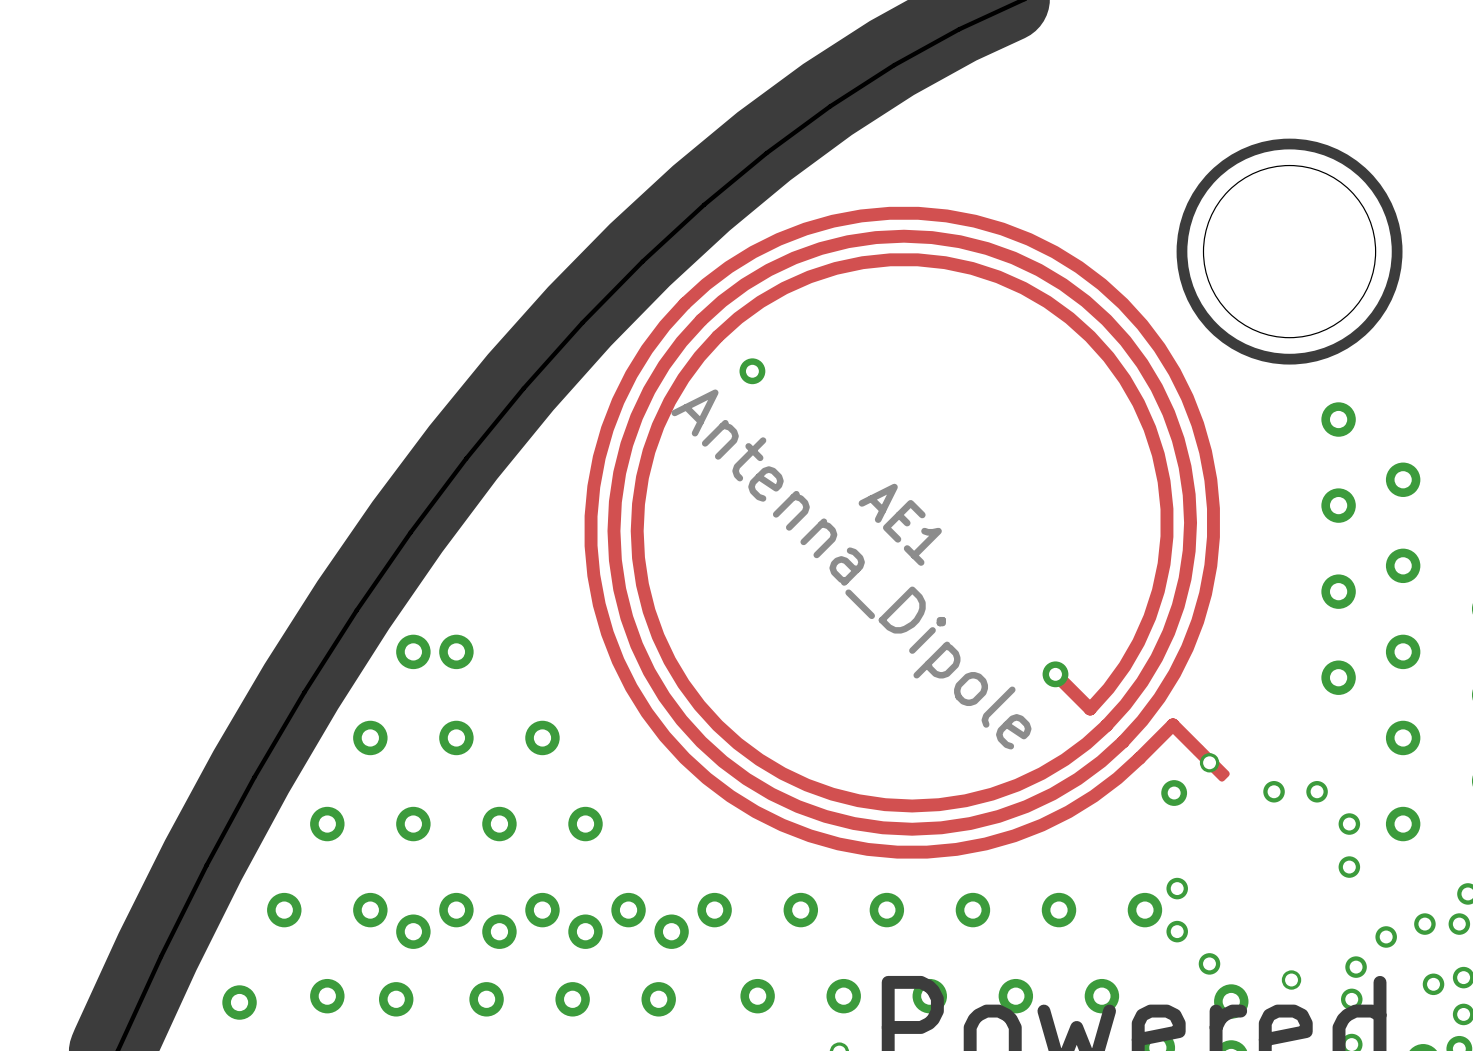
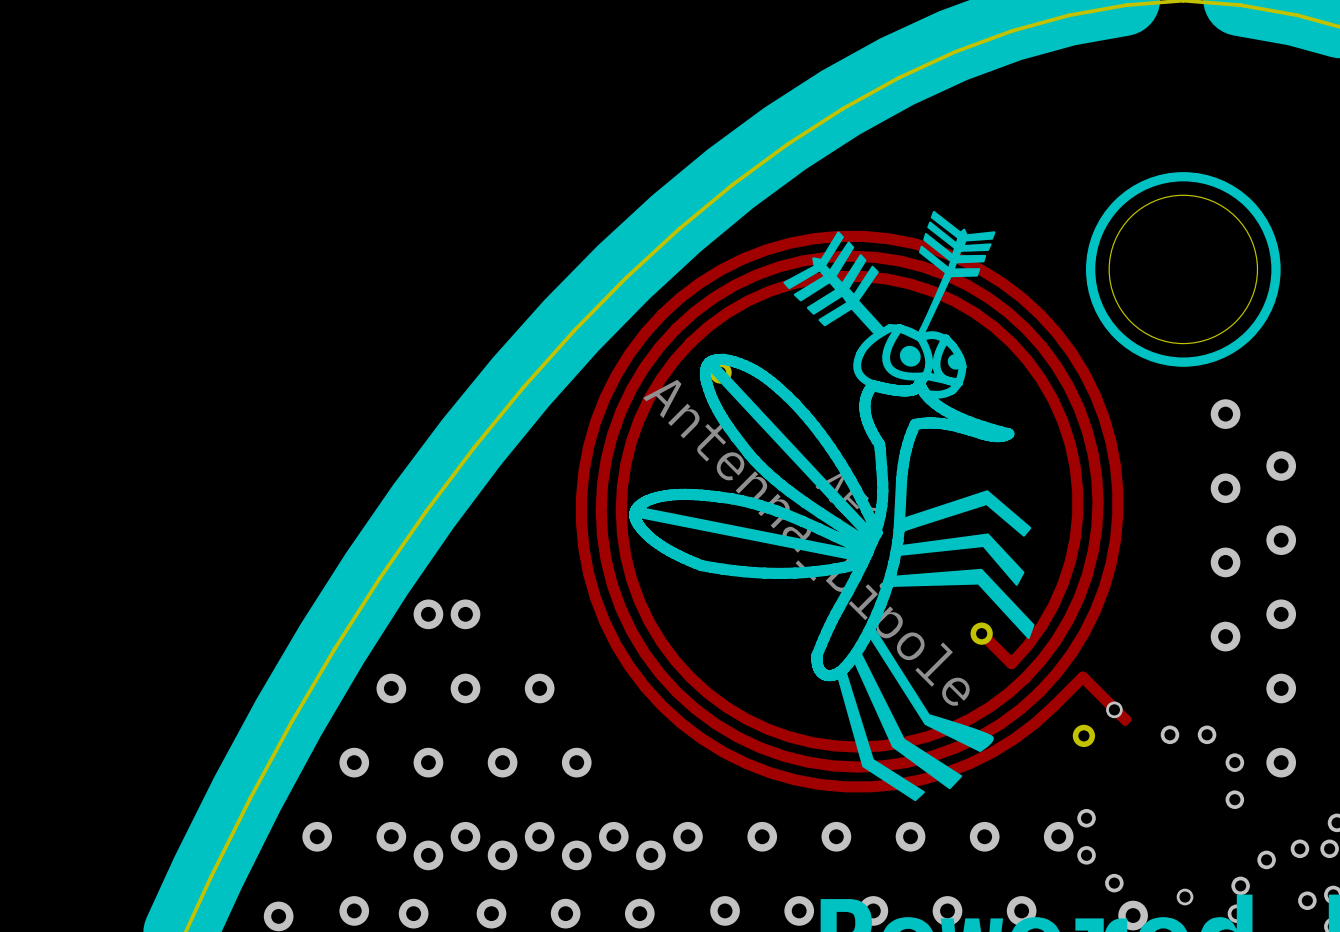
drawing: none -> [783, 210, 996, 370]
line: none -> (952, 345) (945, 338) (942, 343) (938, 352) (936, 367) (942, 377) (959, 382) (925, 375) (898, 374) (888, 367) (886, 360) (888, 346) (899, 327) (920, 337) (930, 335) (938, 336) (944, 339) (947, 341) (949, 343) (952, 345)
line: none -> (952, 345) (962, 365) (958, 382) (948, 392) (926, 394) (919, 385) (929, 365) (927, 352) (921, 339) (908, 331) (889, 328) (868, 342) (858, 358) (858, 372) (863, 378) (871, 383)
line: none -> (718, 359) (710, 362) (706, 367) (705, 378) (708, 389) (722, 418) (749, 454) (767, 473) (789, 491) (869, 544) (877, 532) (866, 510) (840, 463) (810, 420) (787, 396) (763, 376) (740, 363) (718, 359)
line: none -> (709, 362) (872, 537) (864, 556) (637, 512)
line: none -> (919, 383) (915, 388) (907, 390) (872, 385) (866, 397) (864, 407) (866, 418) (879, 444) (882, 483) (881, 506) (875, 531) (867, 552) (832, 620) (816, 655) (818, 668) (826, 675) (839, 672) (852, 658) (868, 631) (884, 594) (897, 541) (904, 458) (915, 424) (944, 424) (994, 436) (1008, 433) (969, 421) (944, 410) (928, 398) (919, 383)
drawing: none -> [836, 490, 1035, 802]
line: none -> (680, 494) (660, 496) (645, 501) (636, 508) (635, 518) (643, 530) (657, 543) (701, 565) (754, 572) (804, 572) (862, 563) (868, 551) (802, 521) (759, 505) (719, 497) (680, 494)

